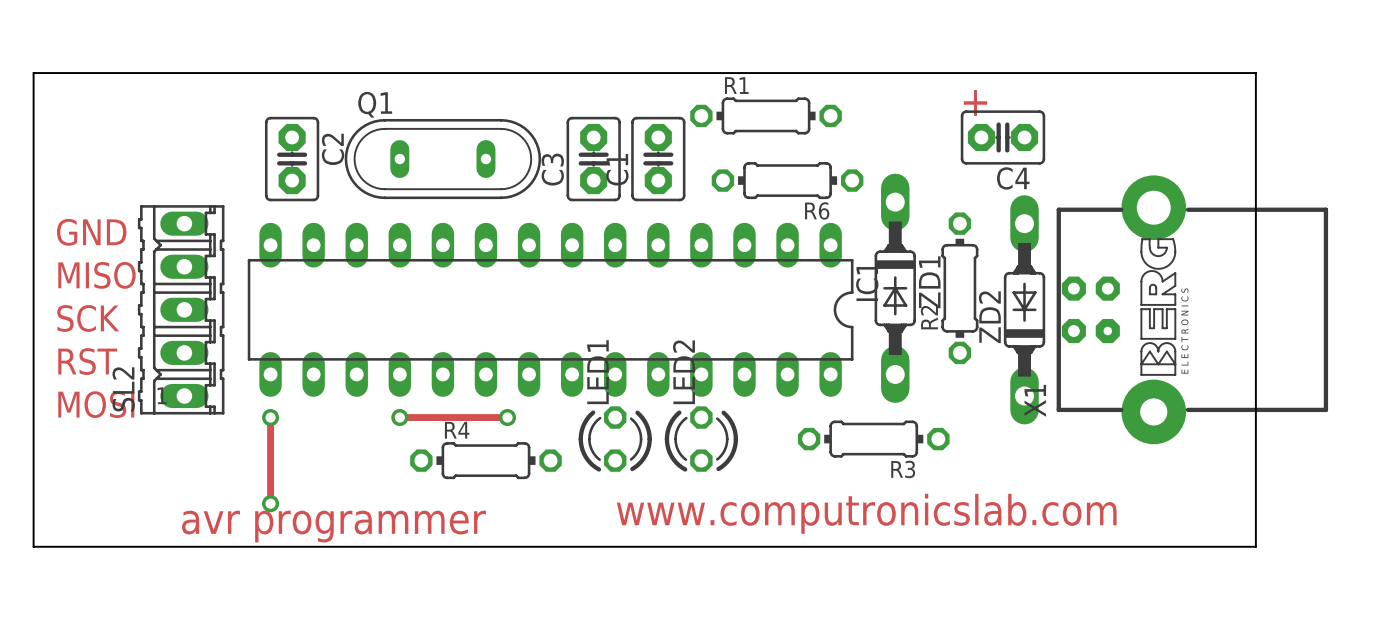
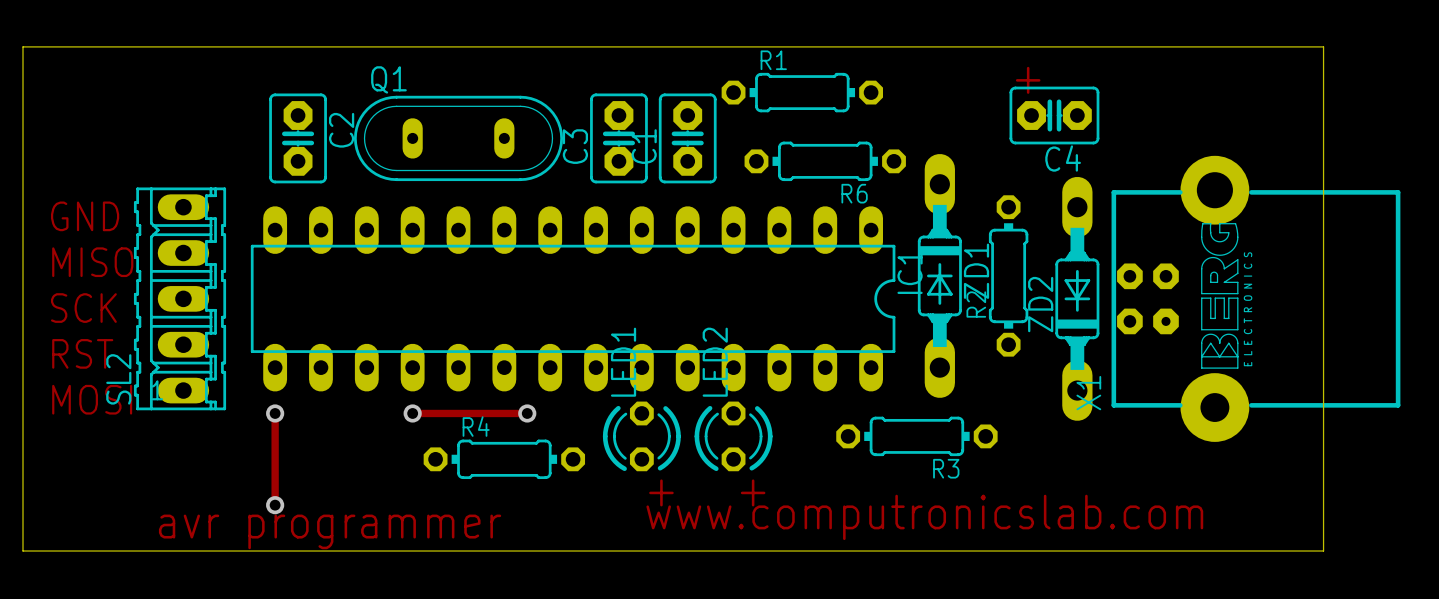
text: none -> + (661, 492)
text: none -> + (753, 492)

